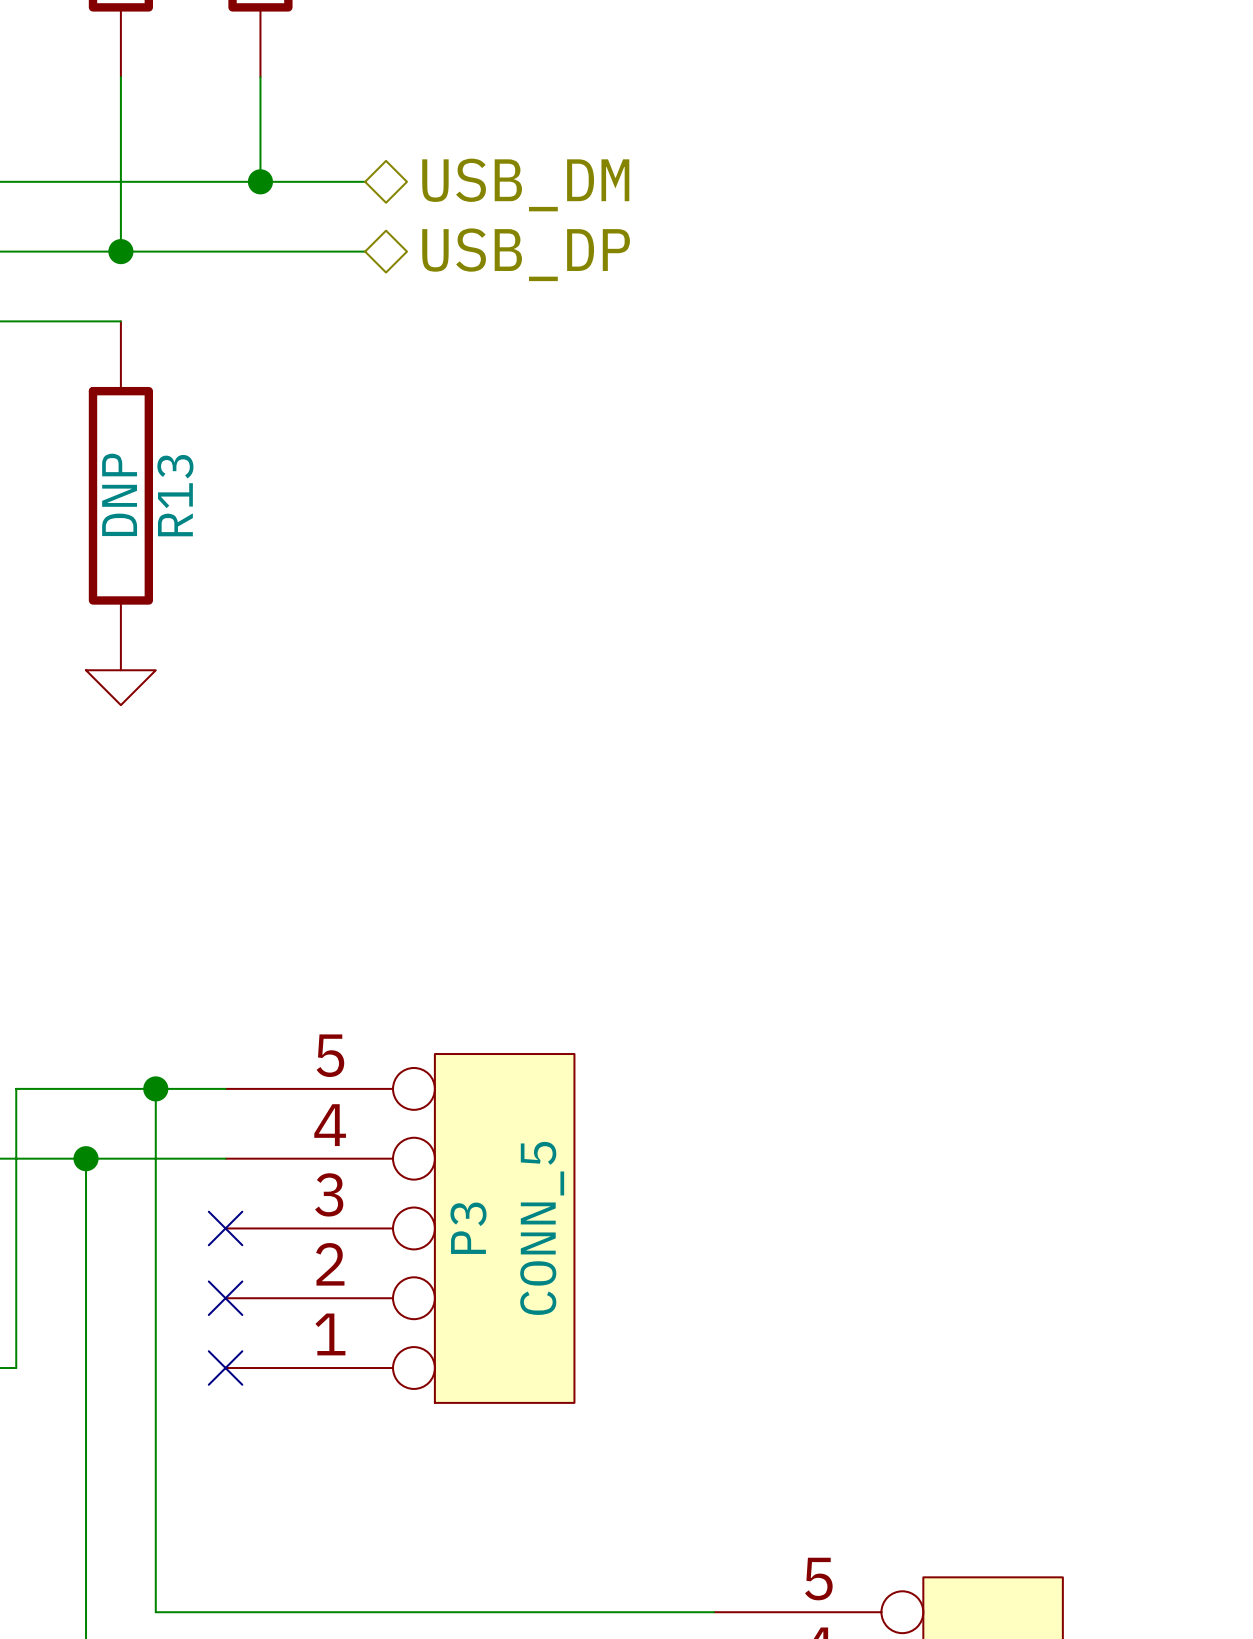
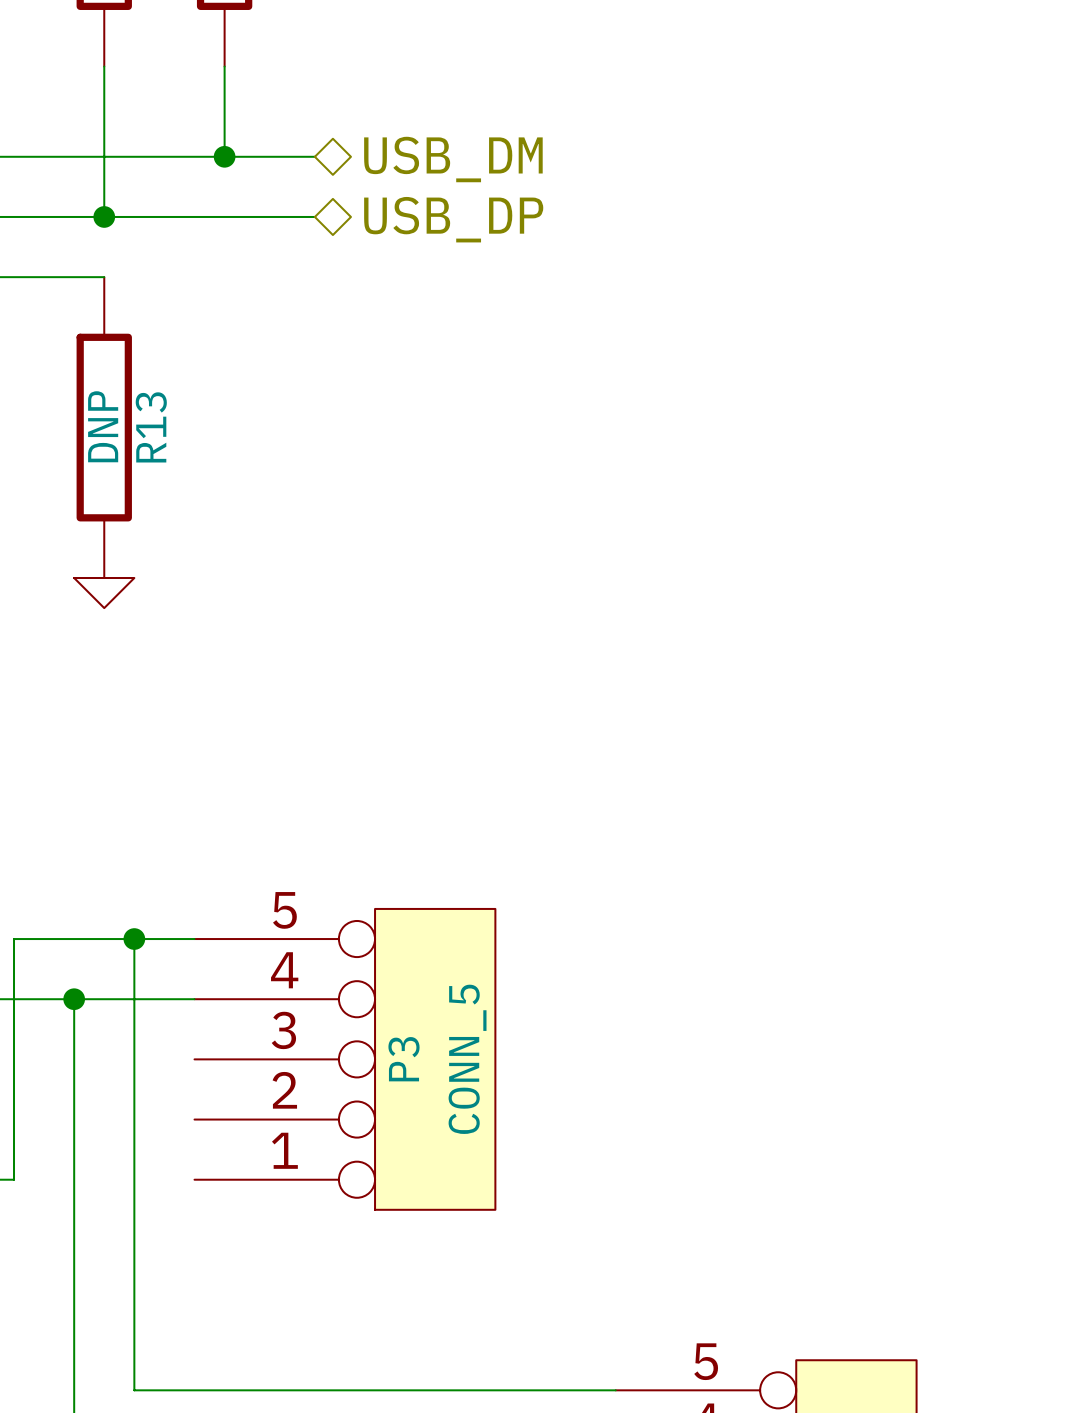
no-connect mark: (225, 1228) -> none
no-connect mark: (225, 1298) -> none
no-connect mark: (225, 1368) -> none

